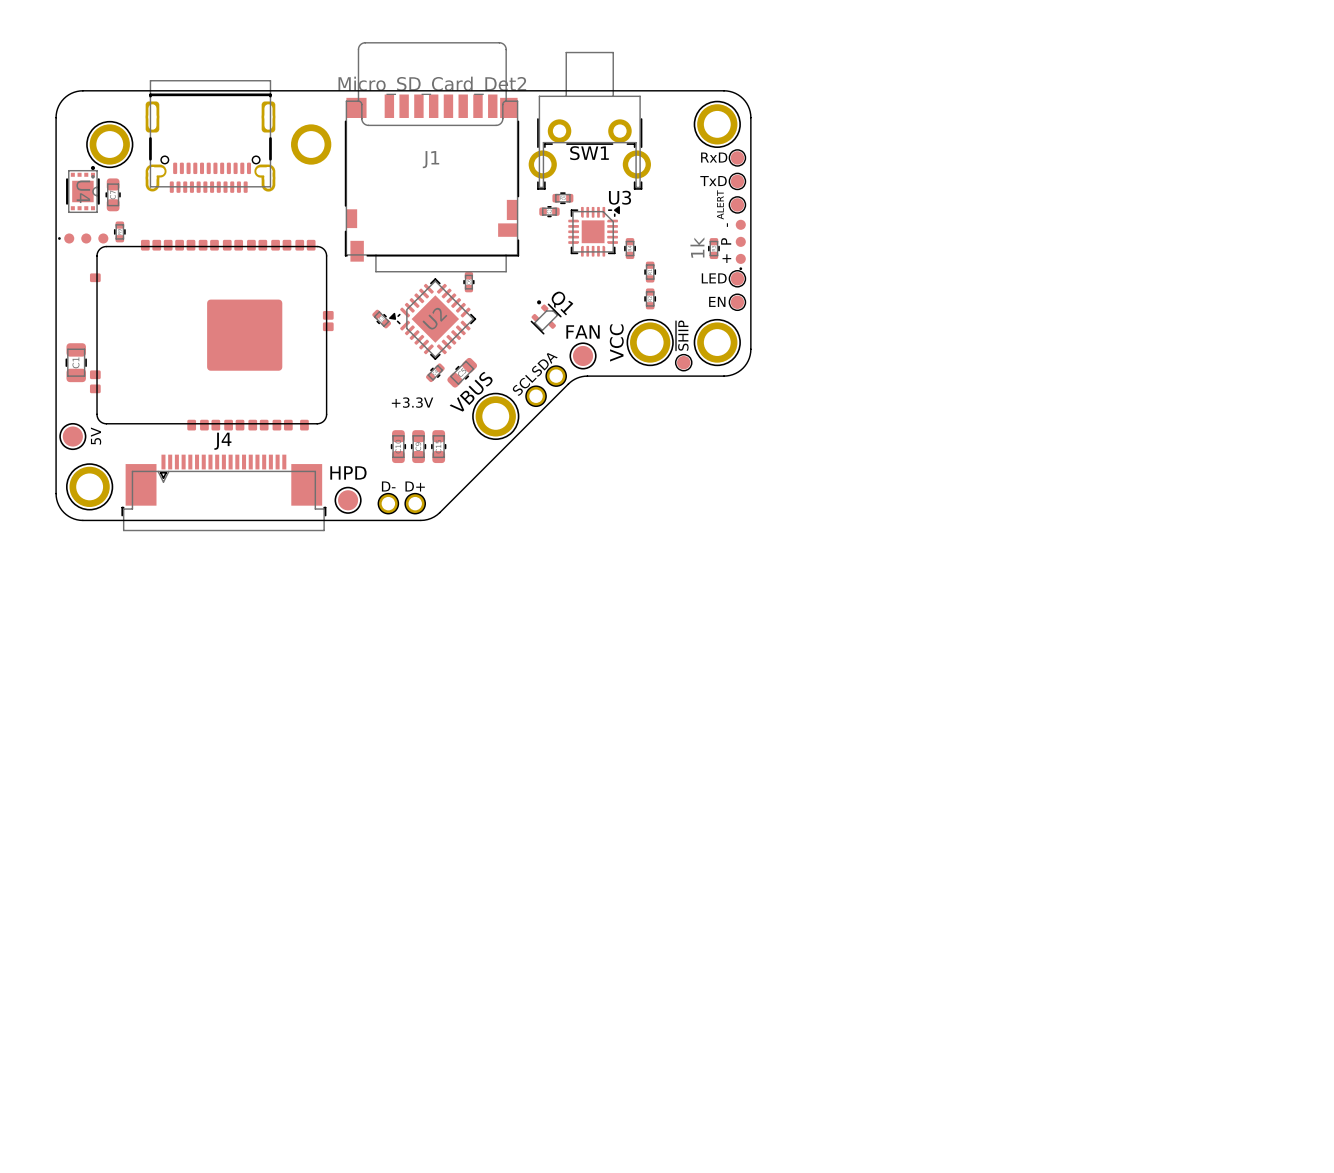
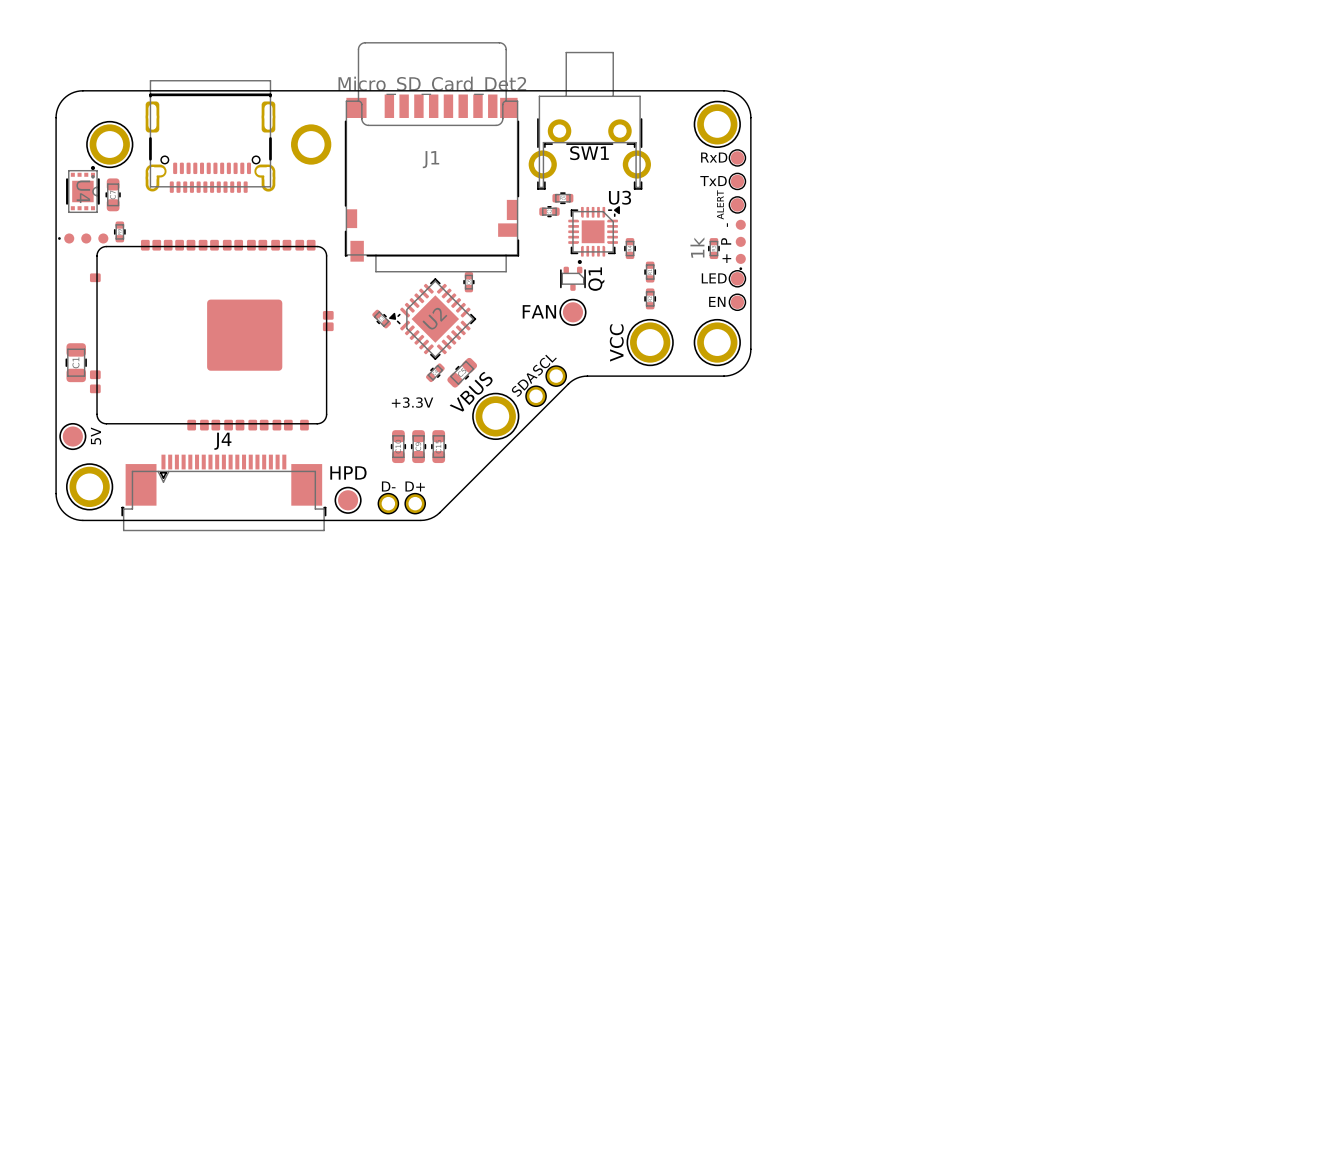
Q1 rotation: 0° (546, 317) -> 45° clockwise (572, 275)
Q1 position: (546, 317) -> (572, 275)
part value position: FAN (583, 331) -> FAN (539, 311)
part position: (583, 355) -> (572, 312)
part: ~{SHIP} (683, 362) -> none
part value: SDA (544, 364) -> SCL (544, 365)
part value: SCL (524, 385) -> SDA (524, 385)

